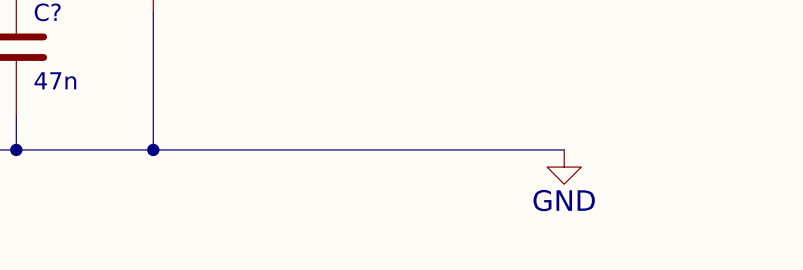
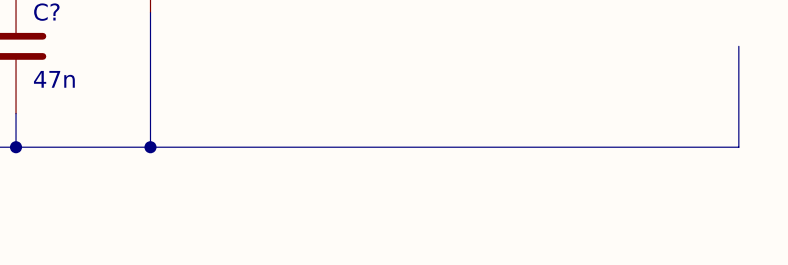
wire: none -> (738, 46) (738, 147) (553, 147)
power symbol: GND (564, 167) -> none

